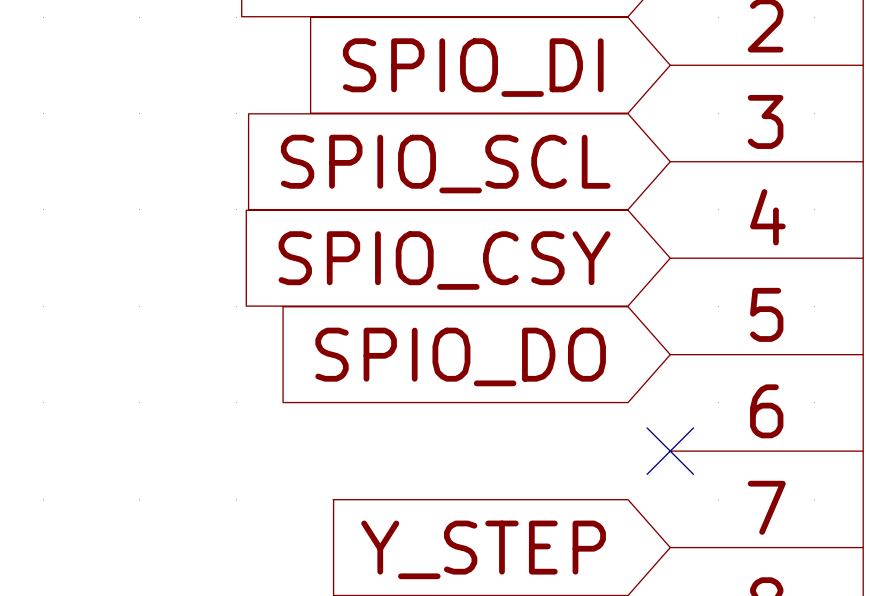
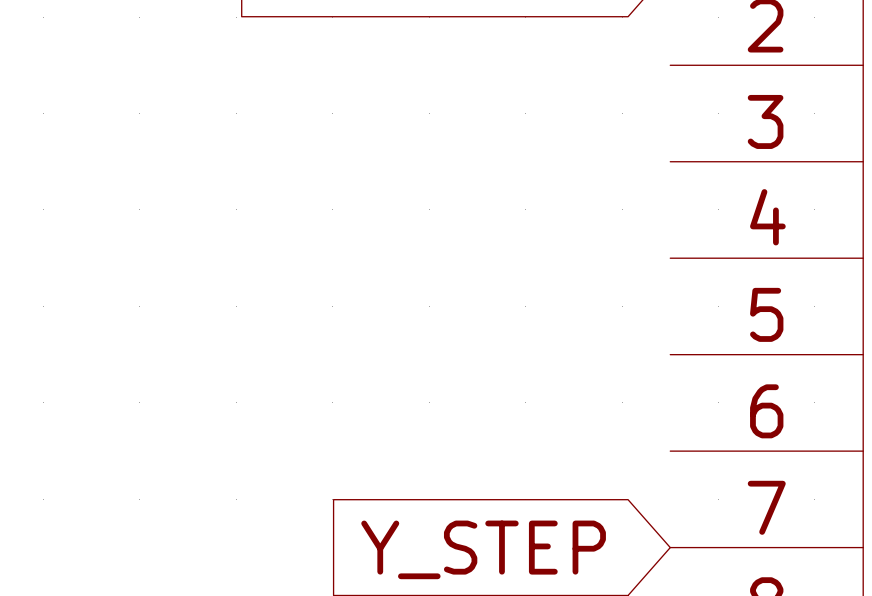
global label: SPIO_DI (473, 67) -> none
global label: SPIO_SCL (445, 164) -> none
global label: SPIO_CSY (444, 260) -> none
global label: SPIO_DO (460, 356) -> none
no-connect mark: (670, 451) -> none

